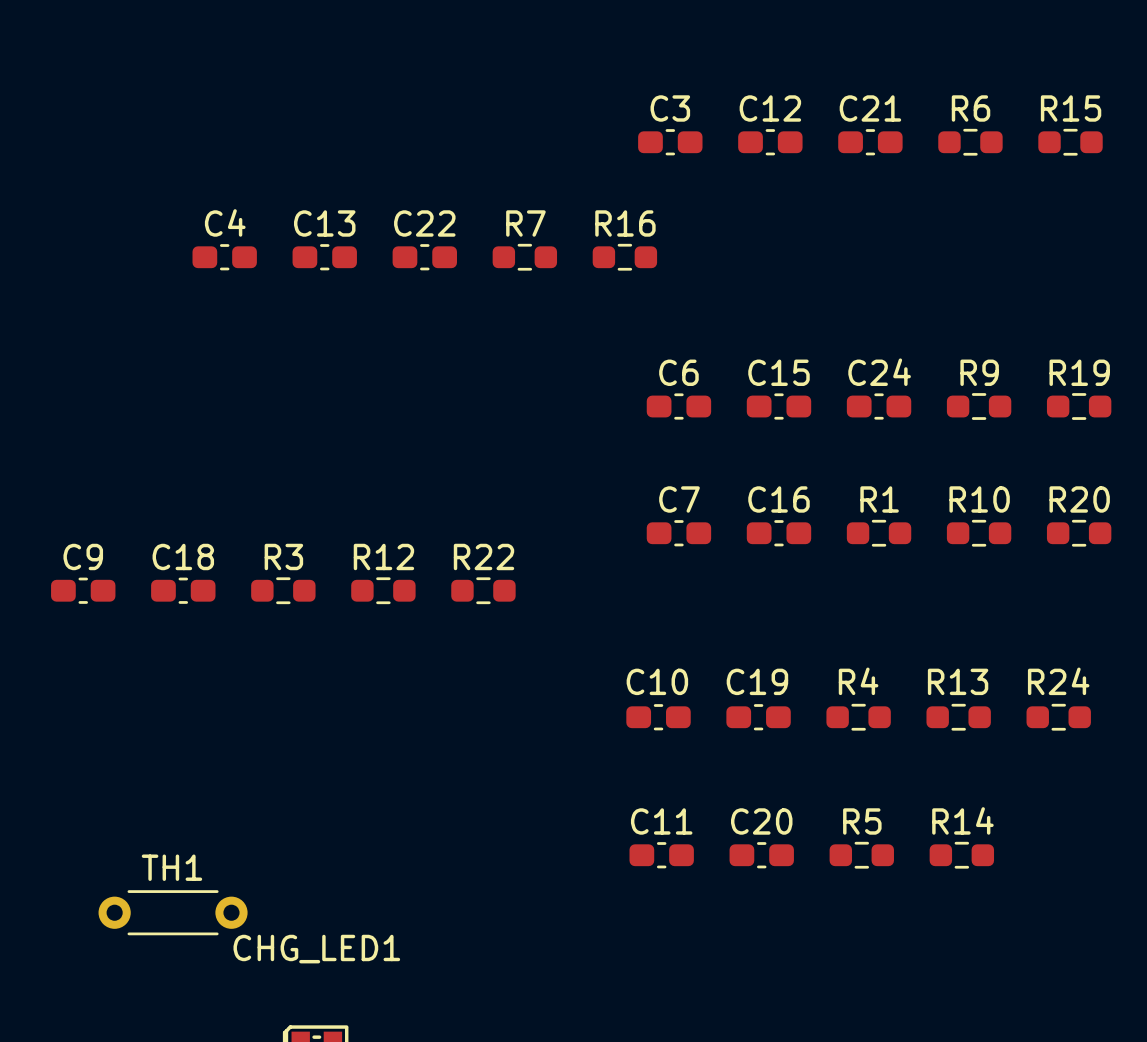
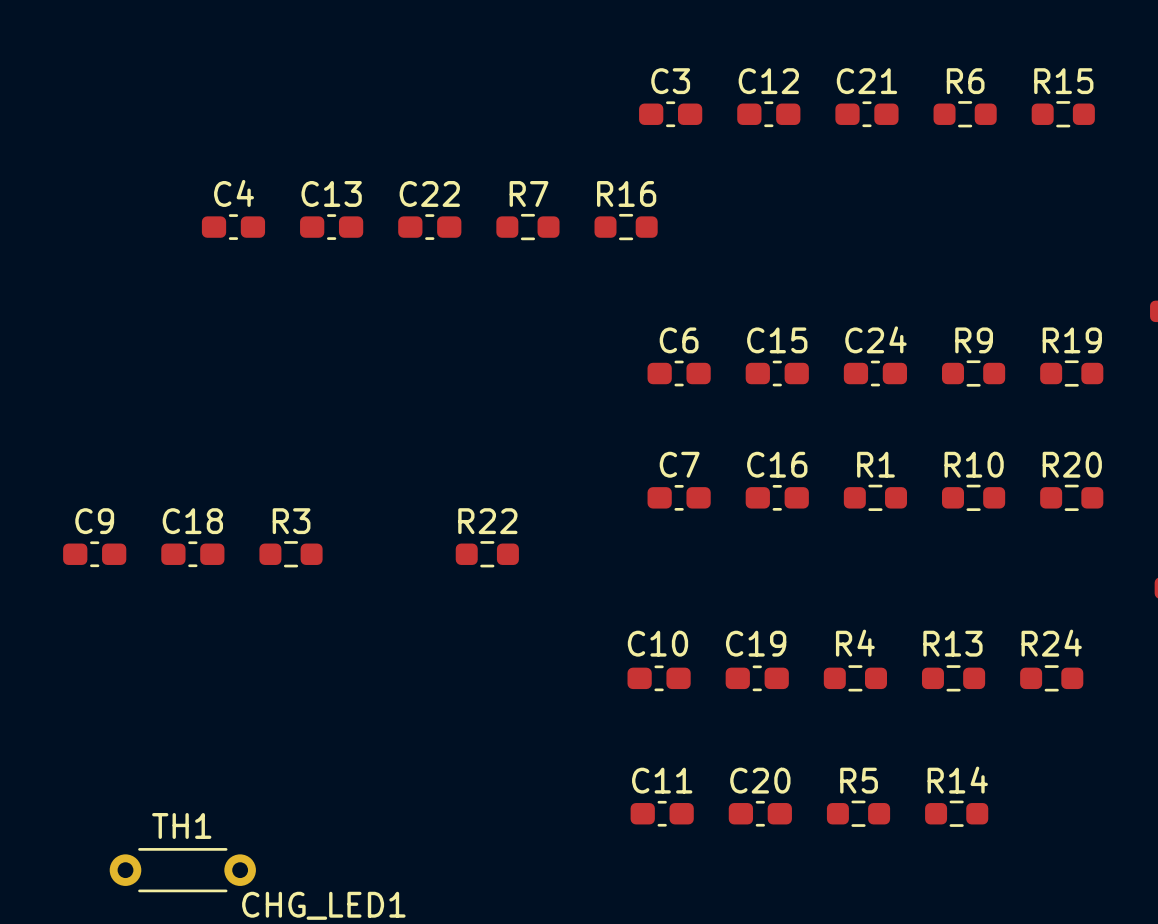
R12: (383, 590) -> none

